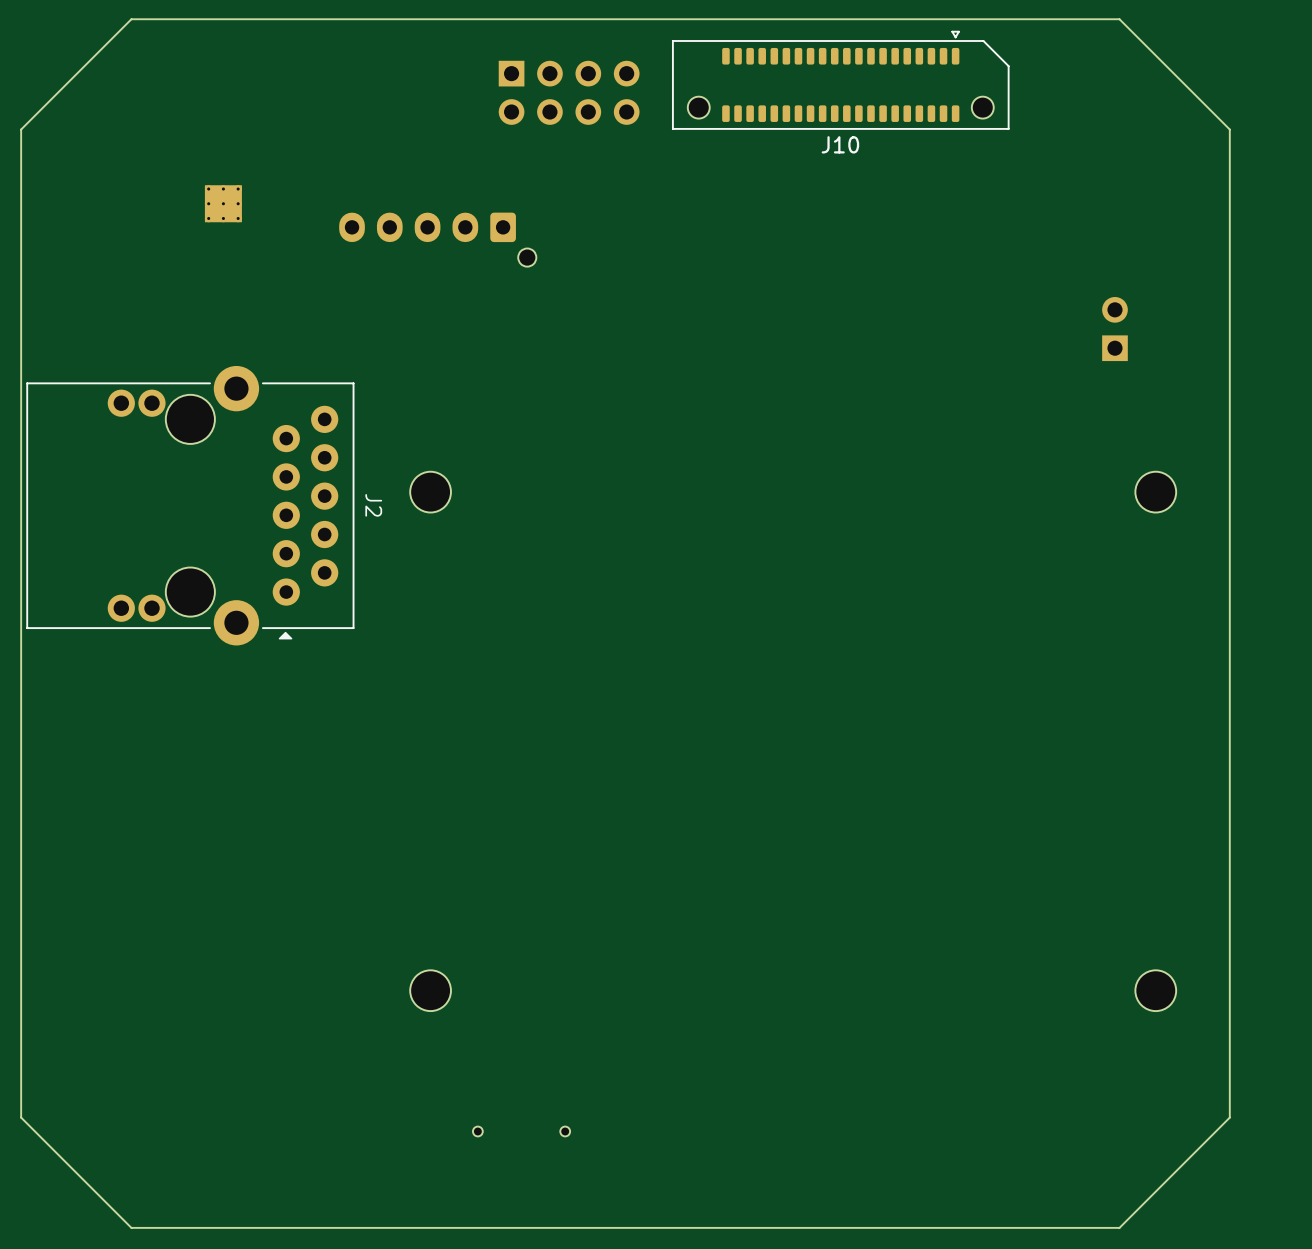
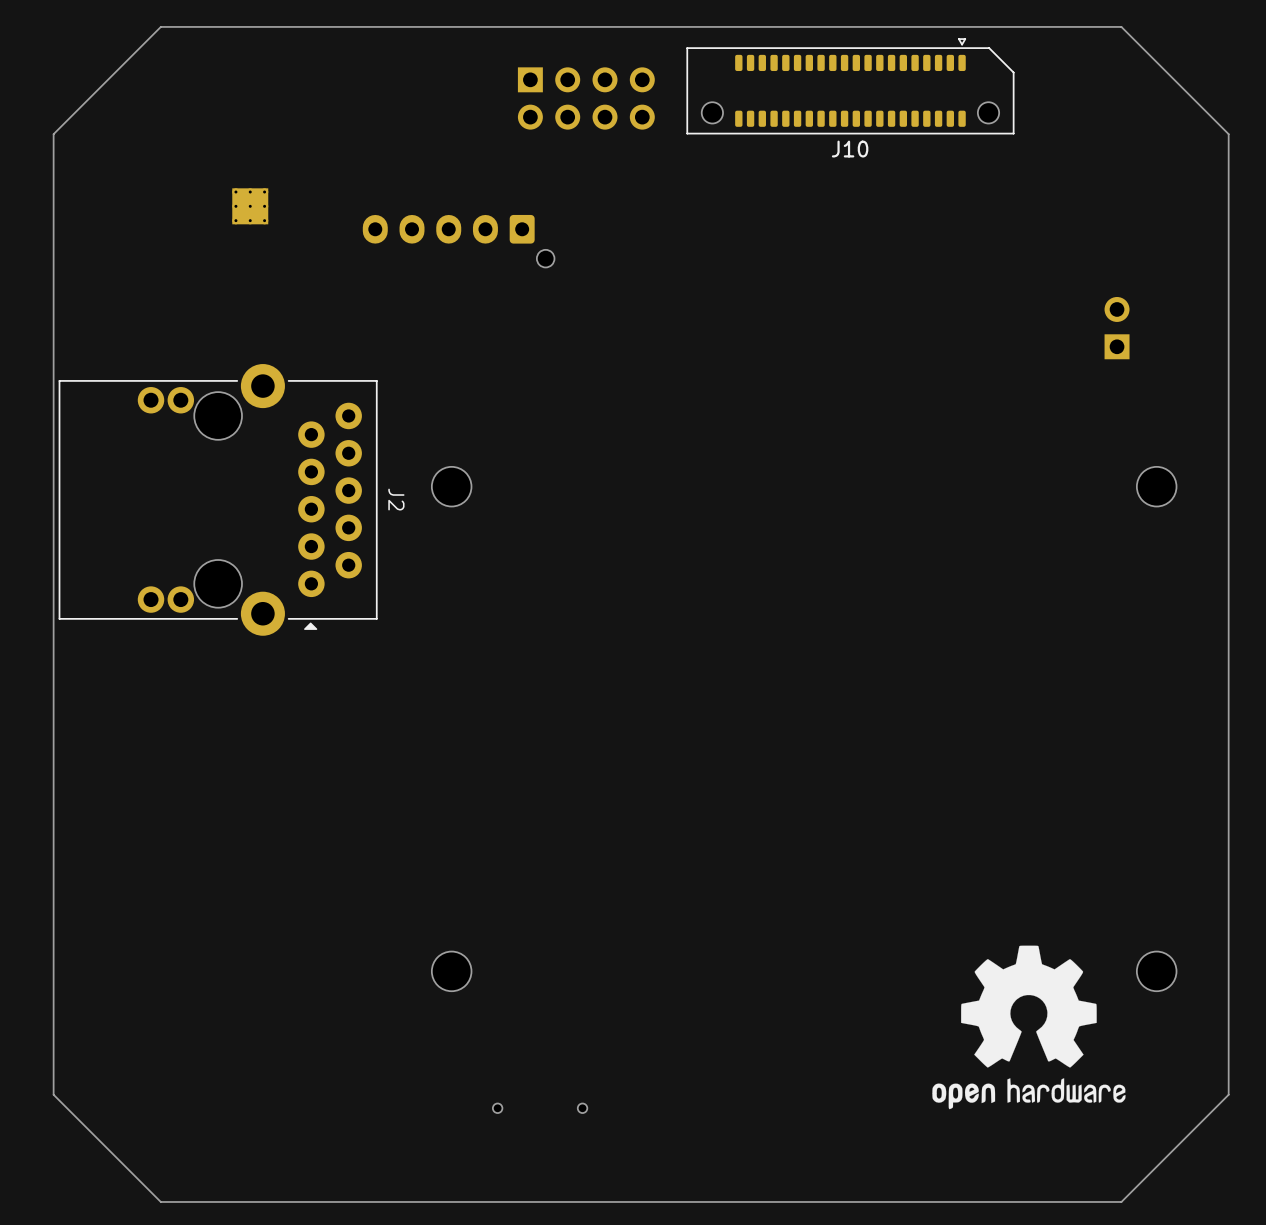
drawing: none -> [932, 945, 1126, 1110]

